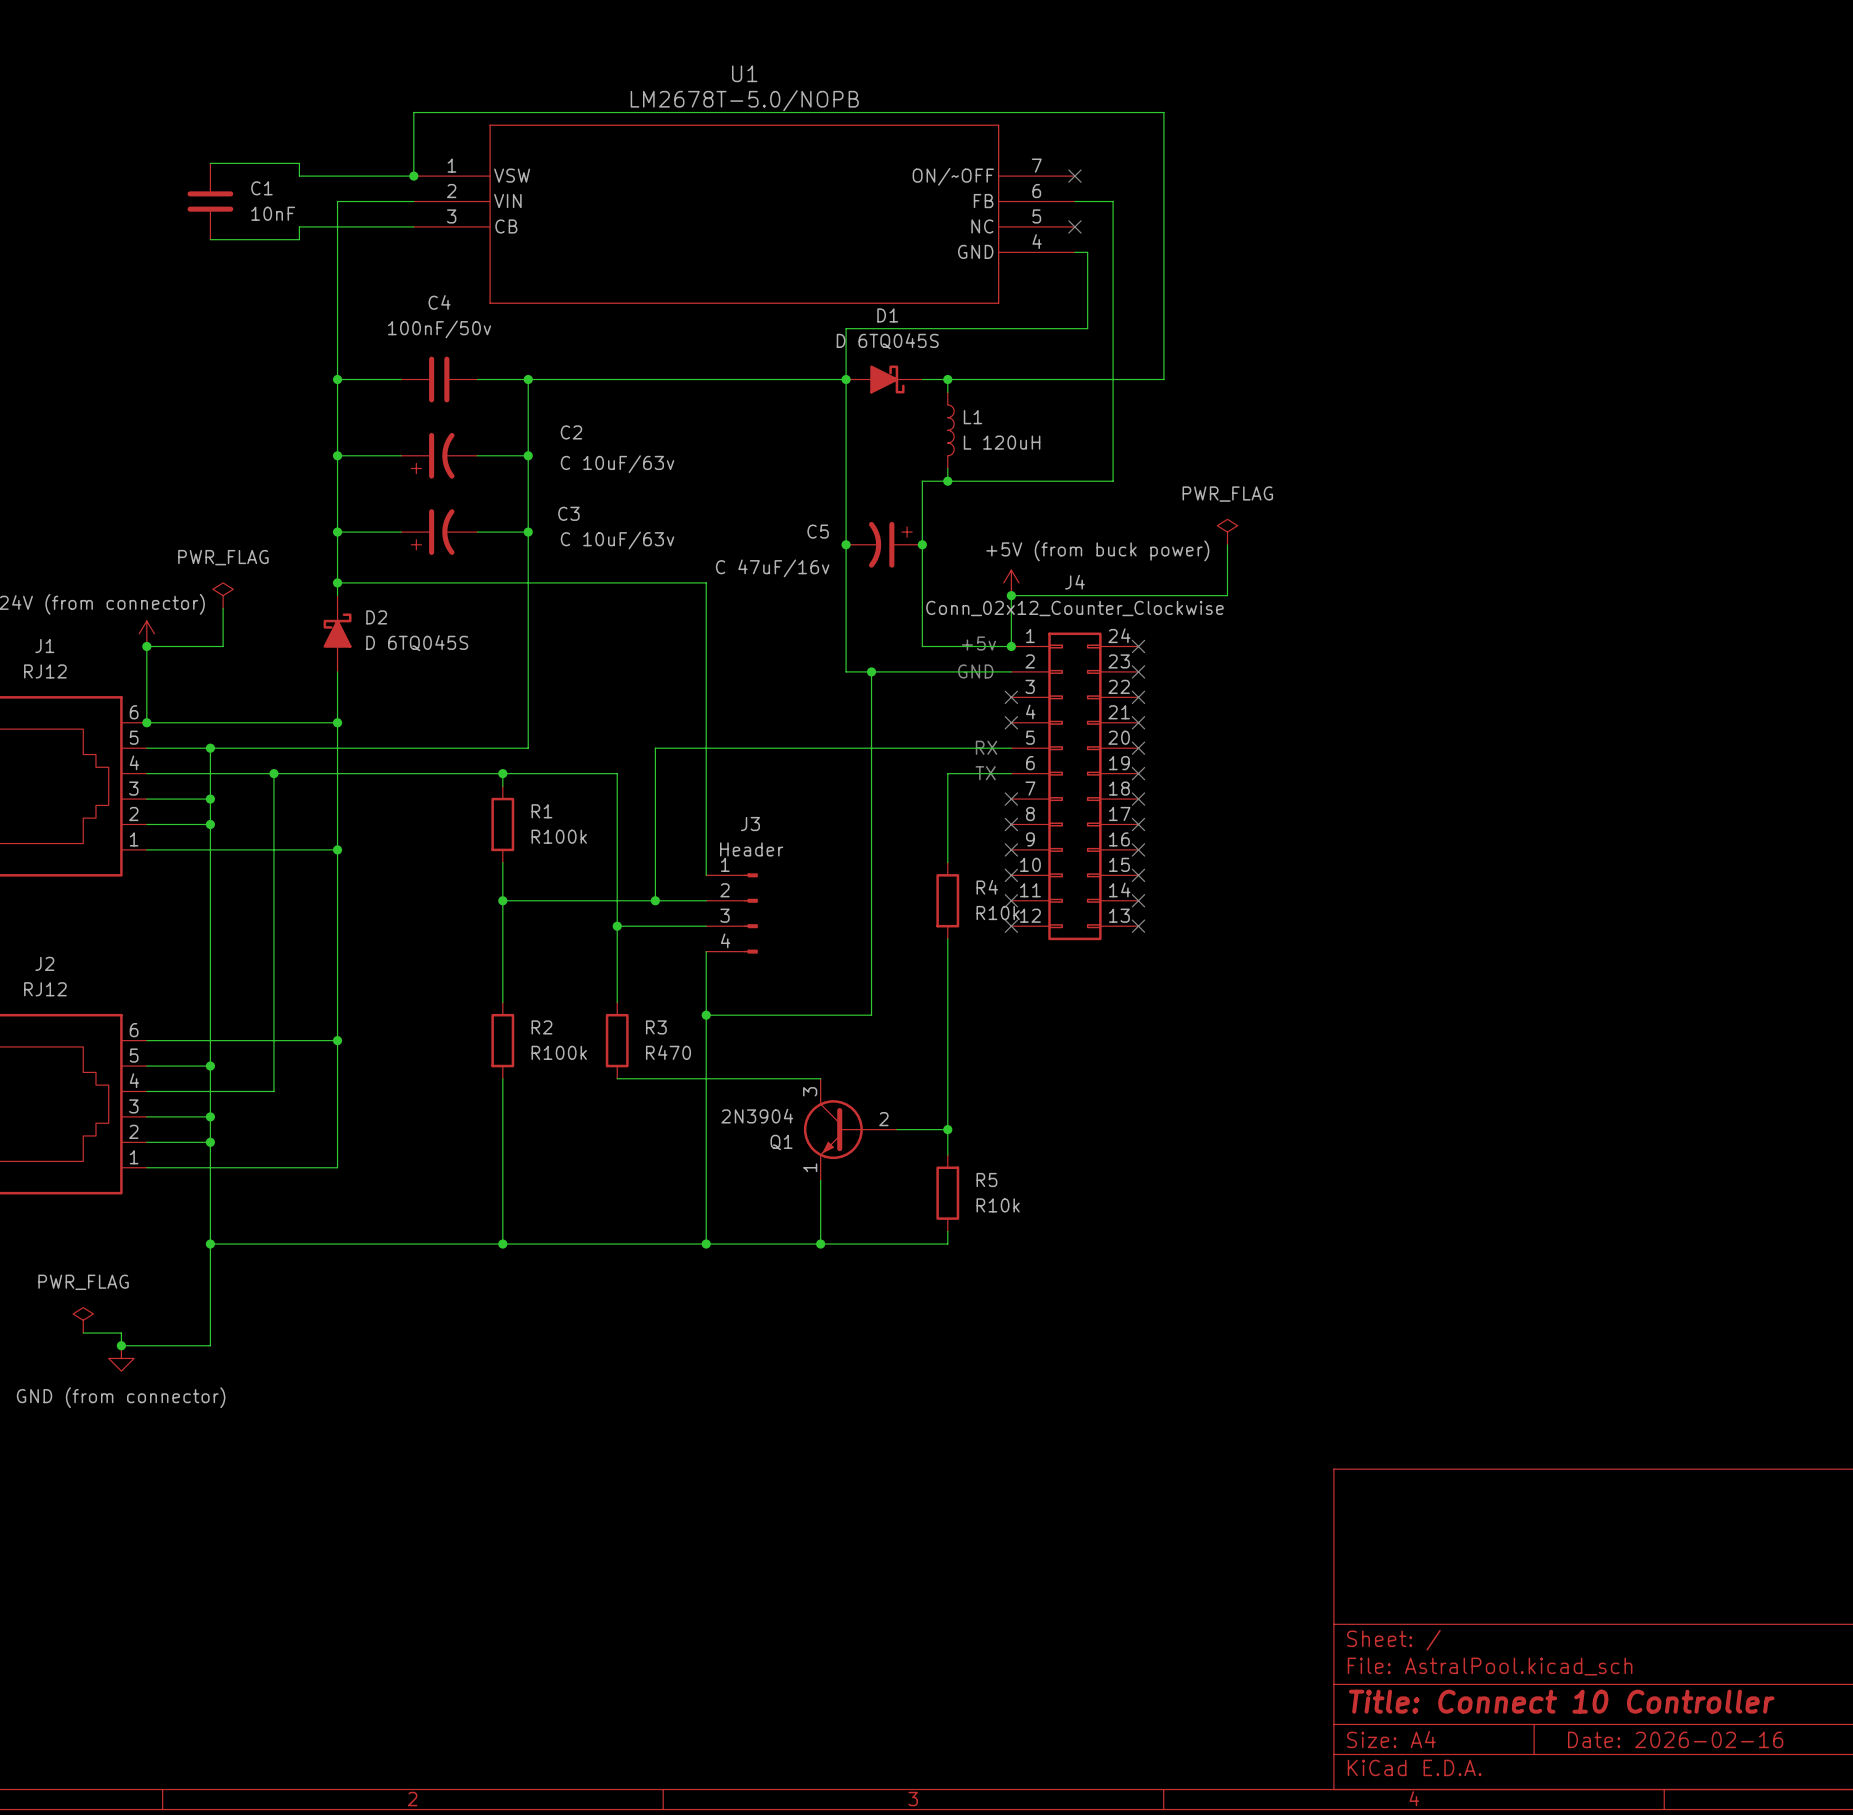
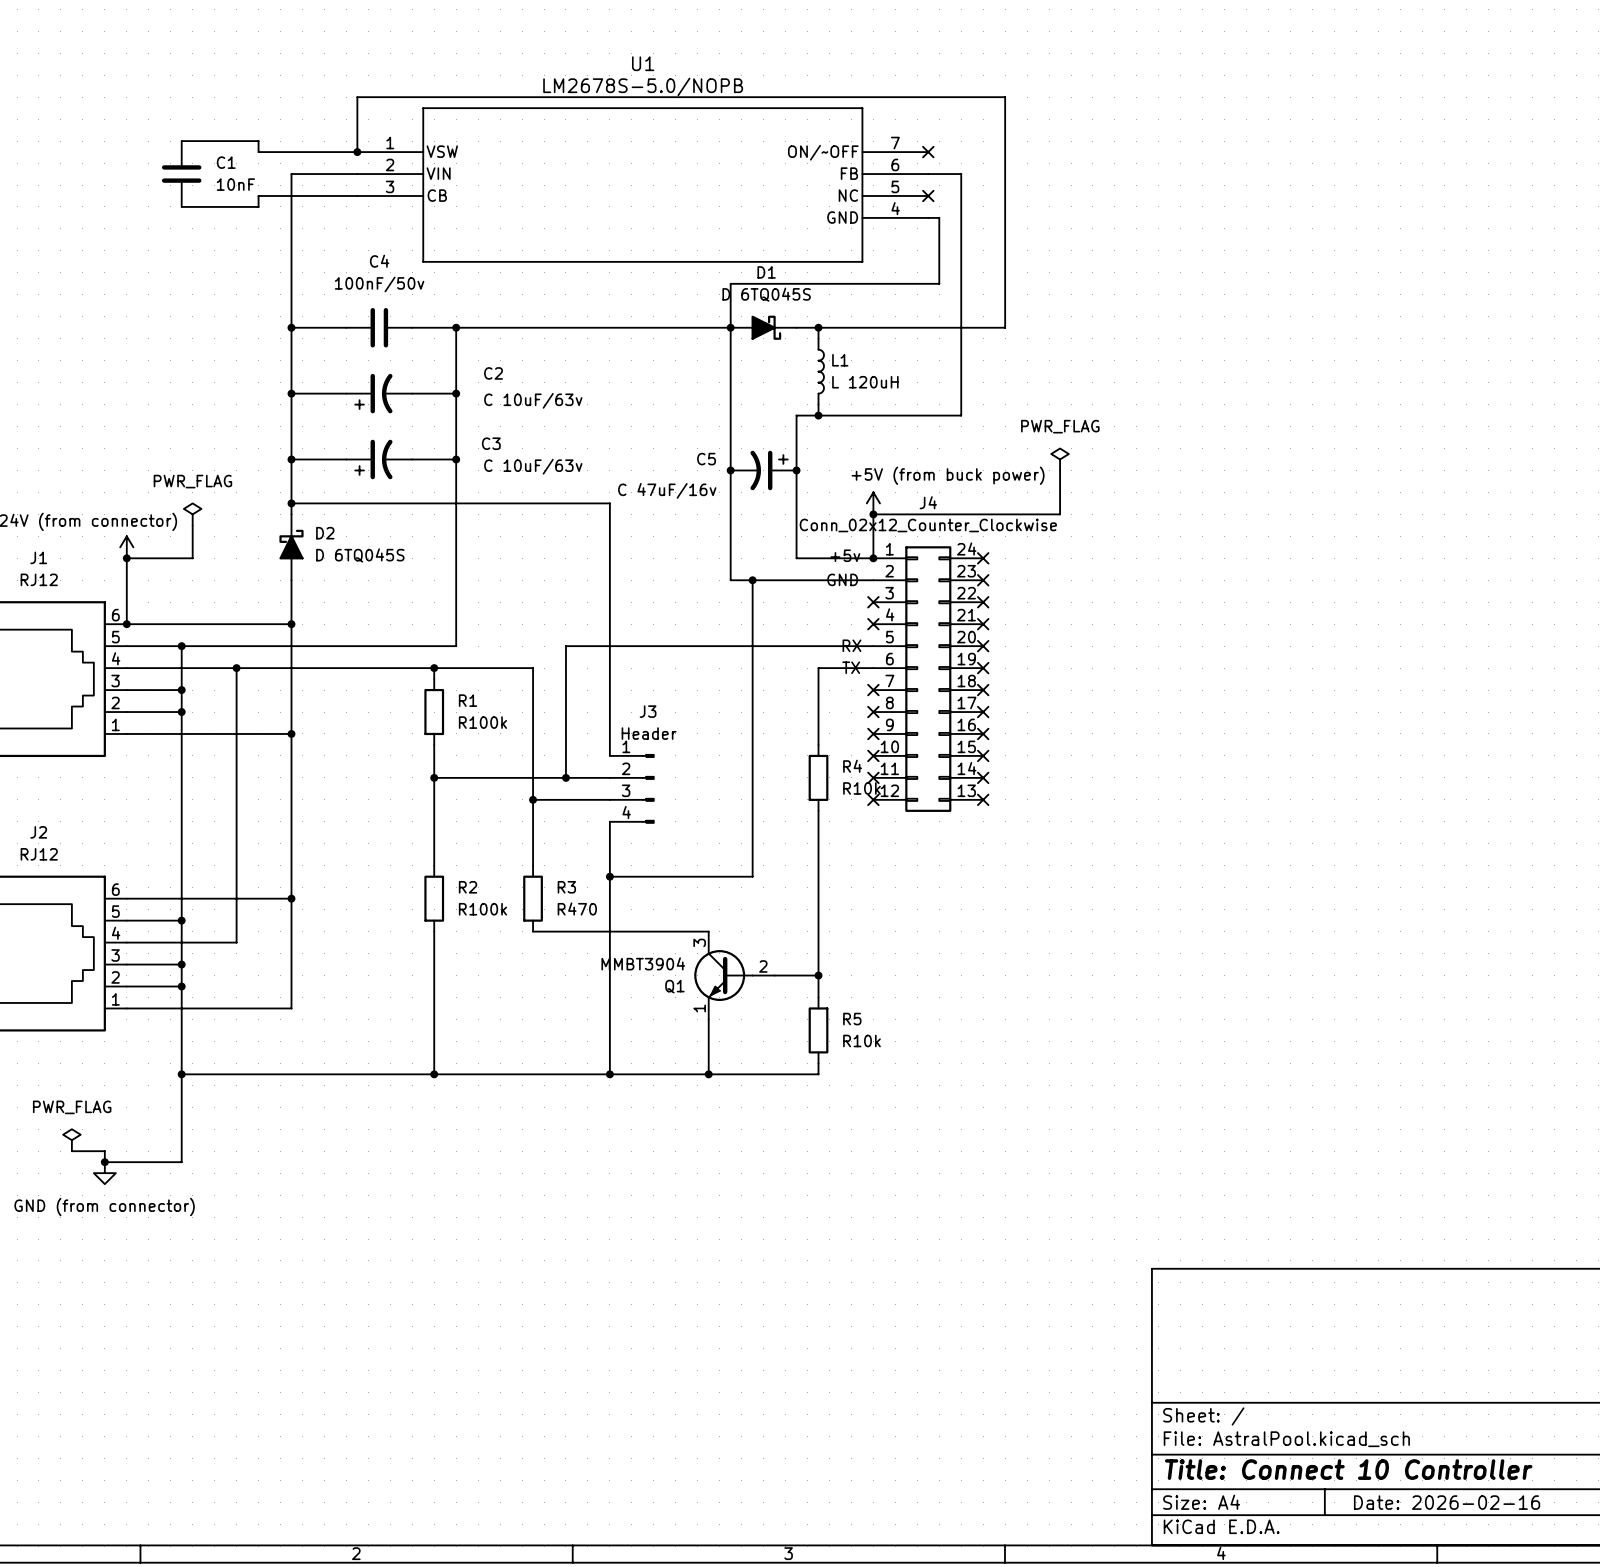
U1 value: LM2678T-5.0/NOPB (744, 100) -> LM2678S-5.0/NOPB (643, 86)
Q1 value: 2N3904 (757, 1116) -> MMBT3904 (643, 963)

